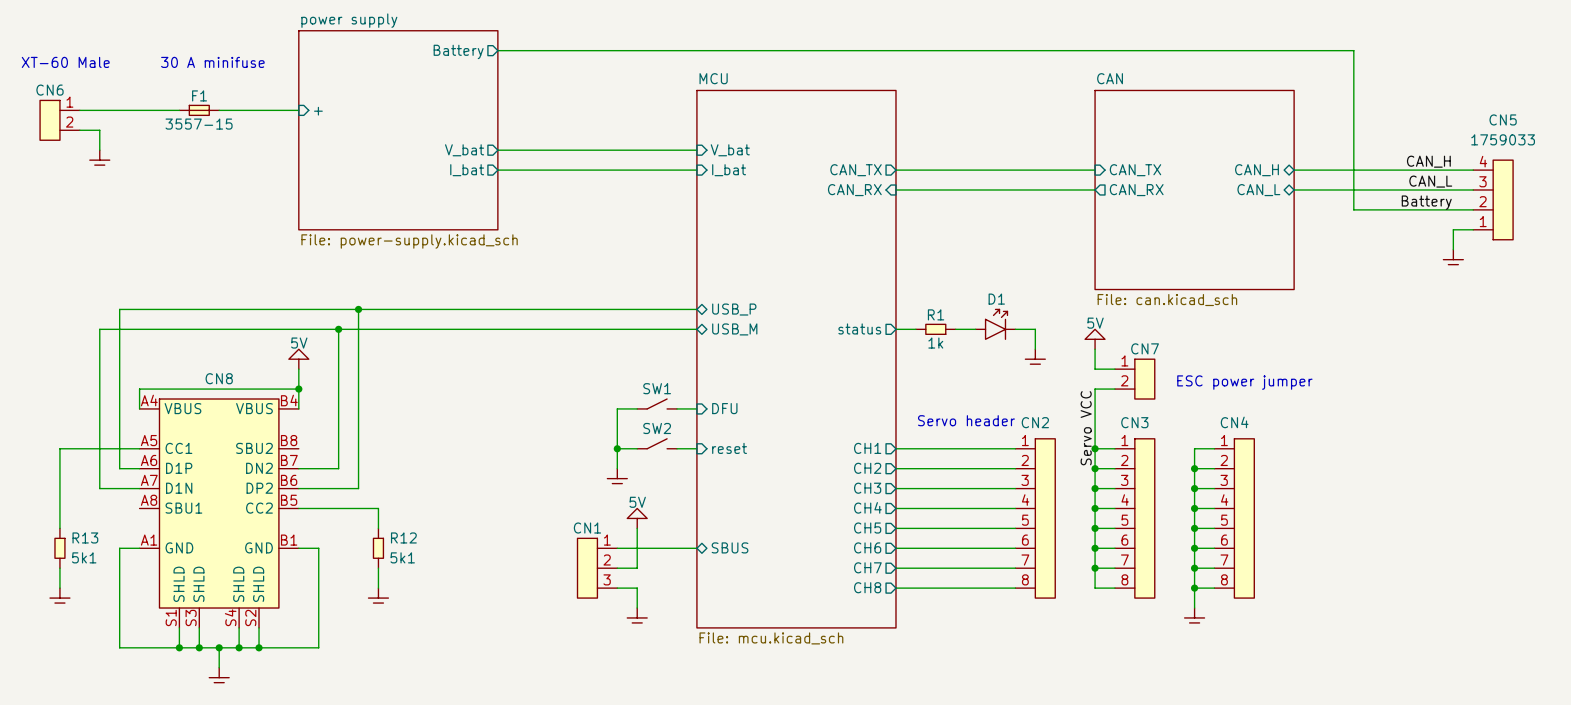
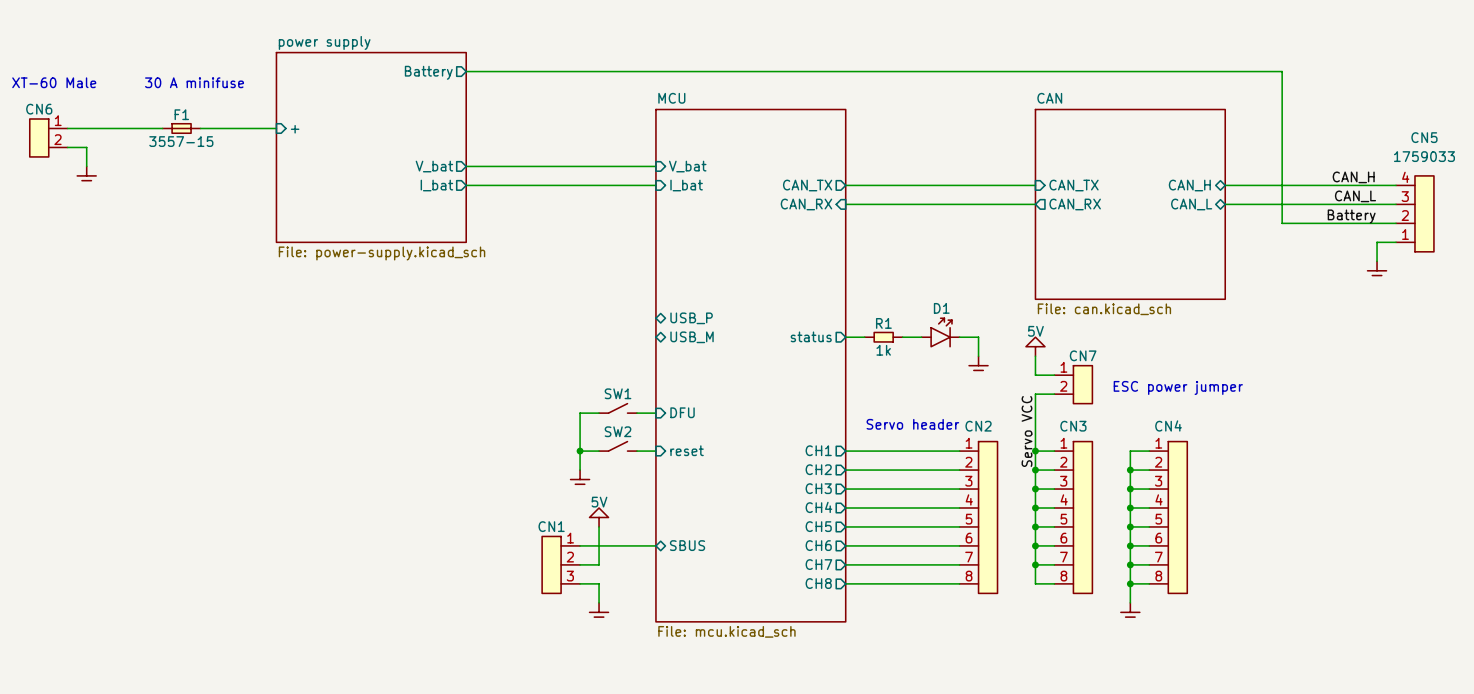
wire: (358, 309) (358, 488) (298, 488) -> none
junction: (358, 309) -> none
wire: (696, 309) (119, 309) (119, 468) (139, 468) -> none
wire: (338, 329) (338, 468) (298, 468) -> none
junction: (338, 329) -> none
wire: (696, 329) (99, 329) (99, 488) (139, 488) -> none
power symbol: 5V (298, 359) -> none
wire: (298, 369) (298, 408) -> none
wire: (298, 389) (139, 389) (139, 408) -> none
junction: (298, 389) -> none
wire: (139, 448) (59, 448) (59, 528) -> none
wire: (298, 508) (378, 508) (378, 528) -> none
CN8: (219, 513) -> none
R13: 5k1 (59, 548) -> none
wire: (139, 548) (119, 548) (119, 647) (318, 647) (318, 548) (298, 548) -> none
R12: 5k1 (378, 548) -> none
wire: (59, 568) (59, 588) -> none
wire: (378, 568) (378, 588) -> none
power symbol: (59, 598) -> none
power symbol: (378, 598) -> none
wire: (179, 627) (179, 647) -> none
wire: (199, 627) (199, 647) -> none
wire: (239, 627) (239, 647) -> none
wire: (259, 627) (259, 647) -> none
junction: (179, 647) -> none
junction: (199, 647) -> none
wire: (219, 647) (219, 667) -> none
junction: (219, 647) -> none
junction: (239, 647) -> none
junction: (259, 647) -> none
power symbol: (219, 677) -> none

